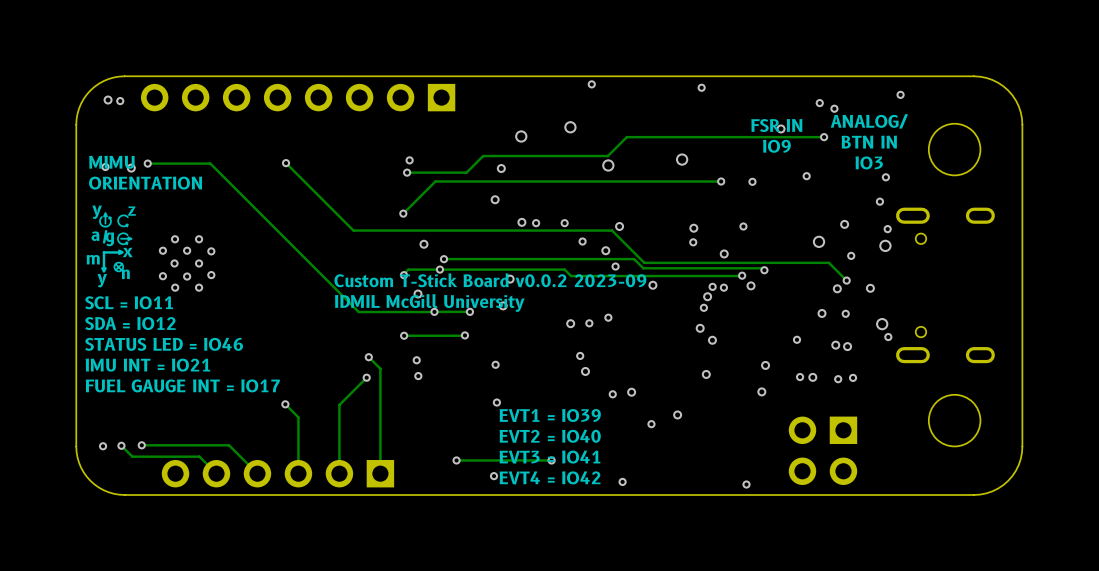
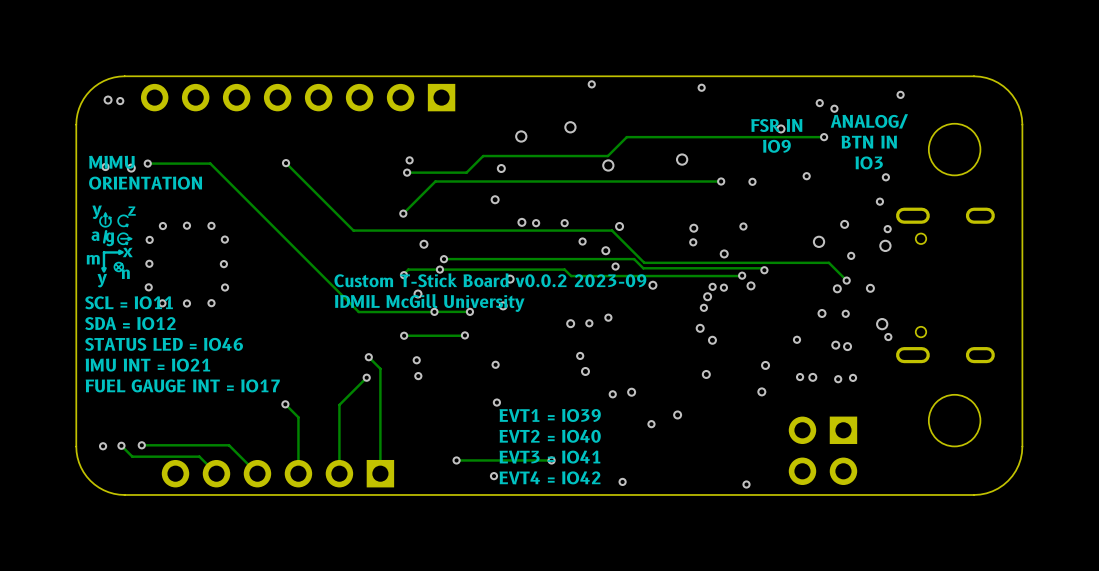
via: none -> (186, 225)
via: none -> (211, 225)
via: none -> (162, 226)
via: none -> (149, 239)
via: (175, 239) -> none
via: (199, 239) -> none
via: none -> (224, 239)
via: (162, 250) -> none
via: (187, 250) -> none
via: (211, 251) -> none
via: none -> (149, 263)
via: (174, 263) -> none
via: (199, 263) -> none
via: none -> (223, 264)
via: (211, 275) -> none
via: (162, 276) -> none
via: (187, 276) -> none
via: none -> (148, 287)
via: (175, 287) -> none
via: (199, 287) -> none
via: none -> (225, 287)
via: none -> (162, 303)
via: none -> (186, 303)
via: none -> (211, 303)

